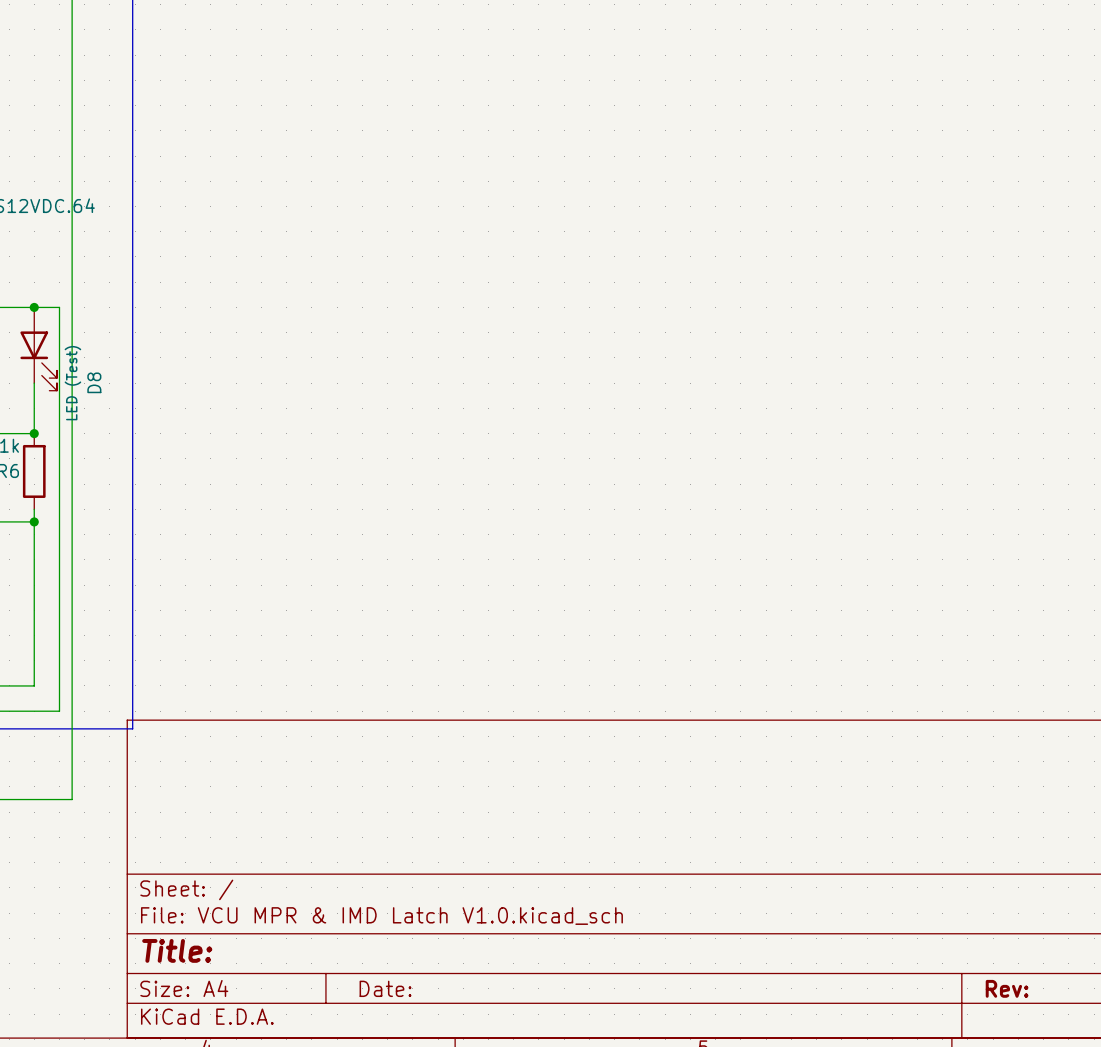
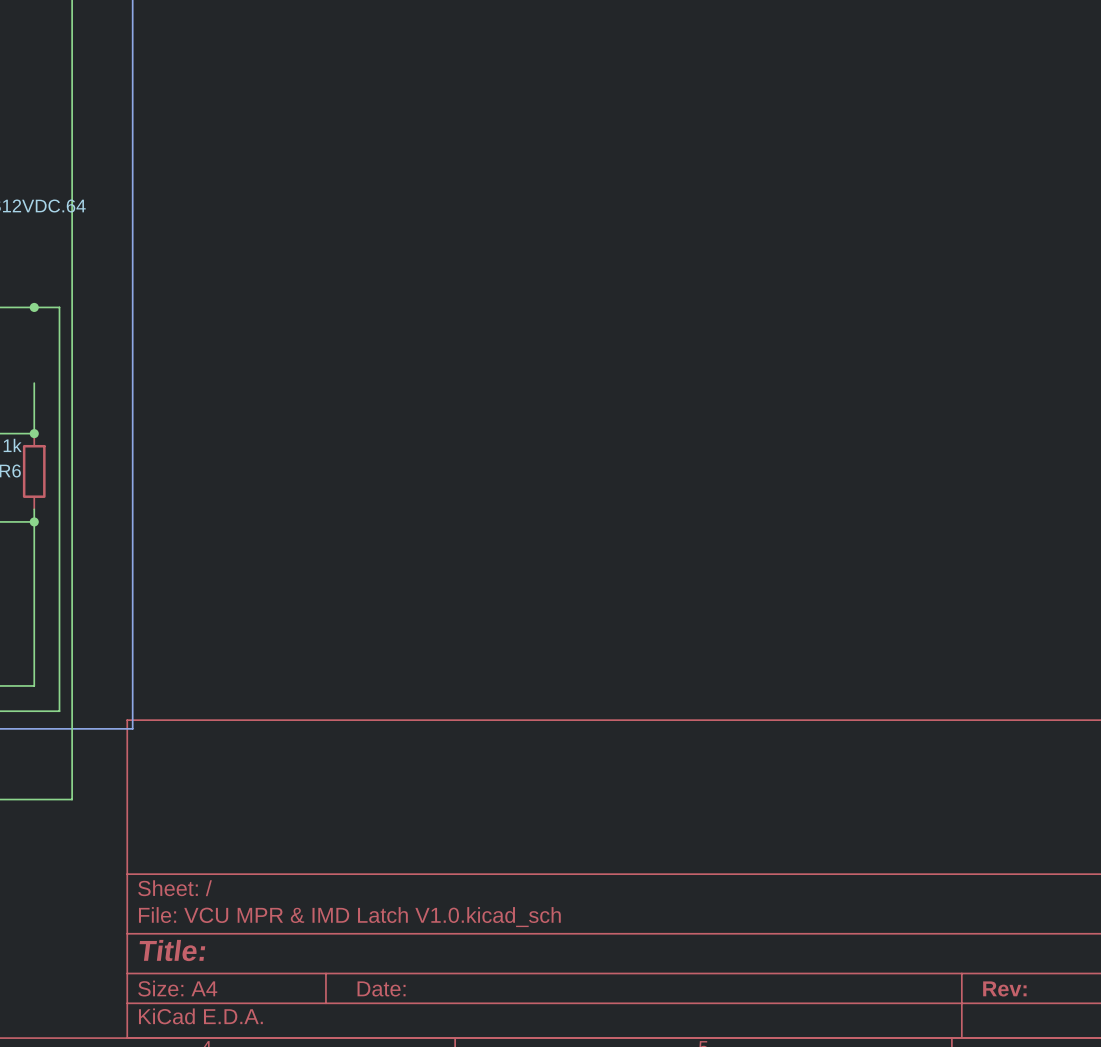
D8: LED (Test) (38, 349) -> none

